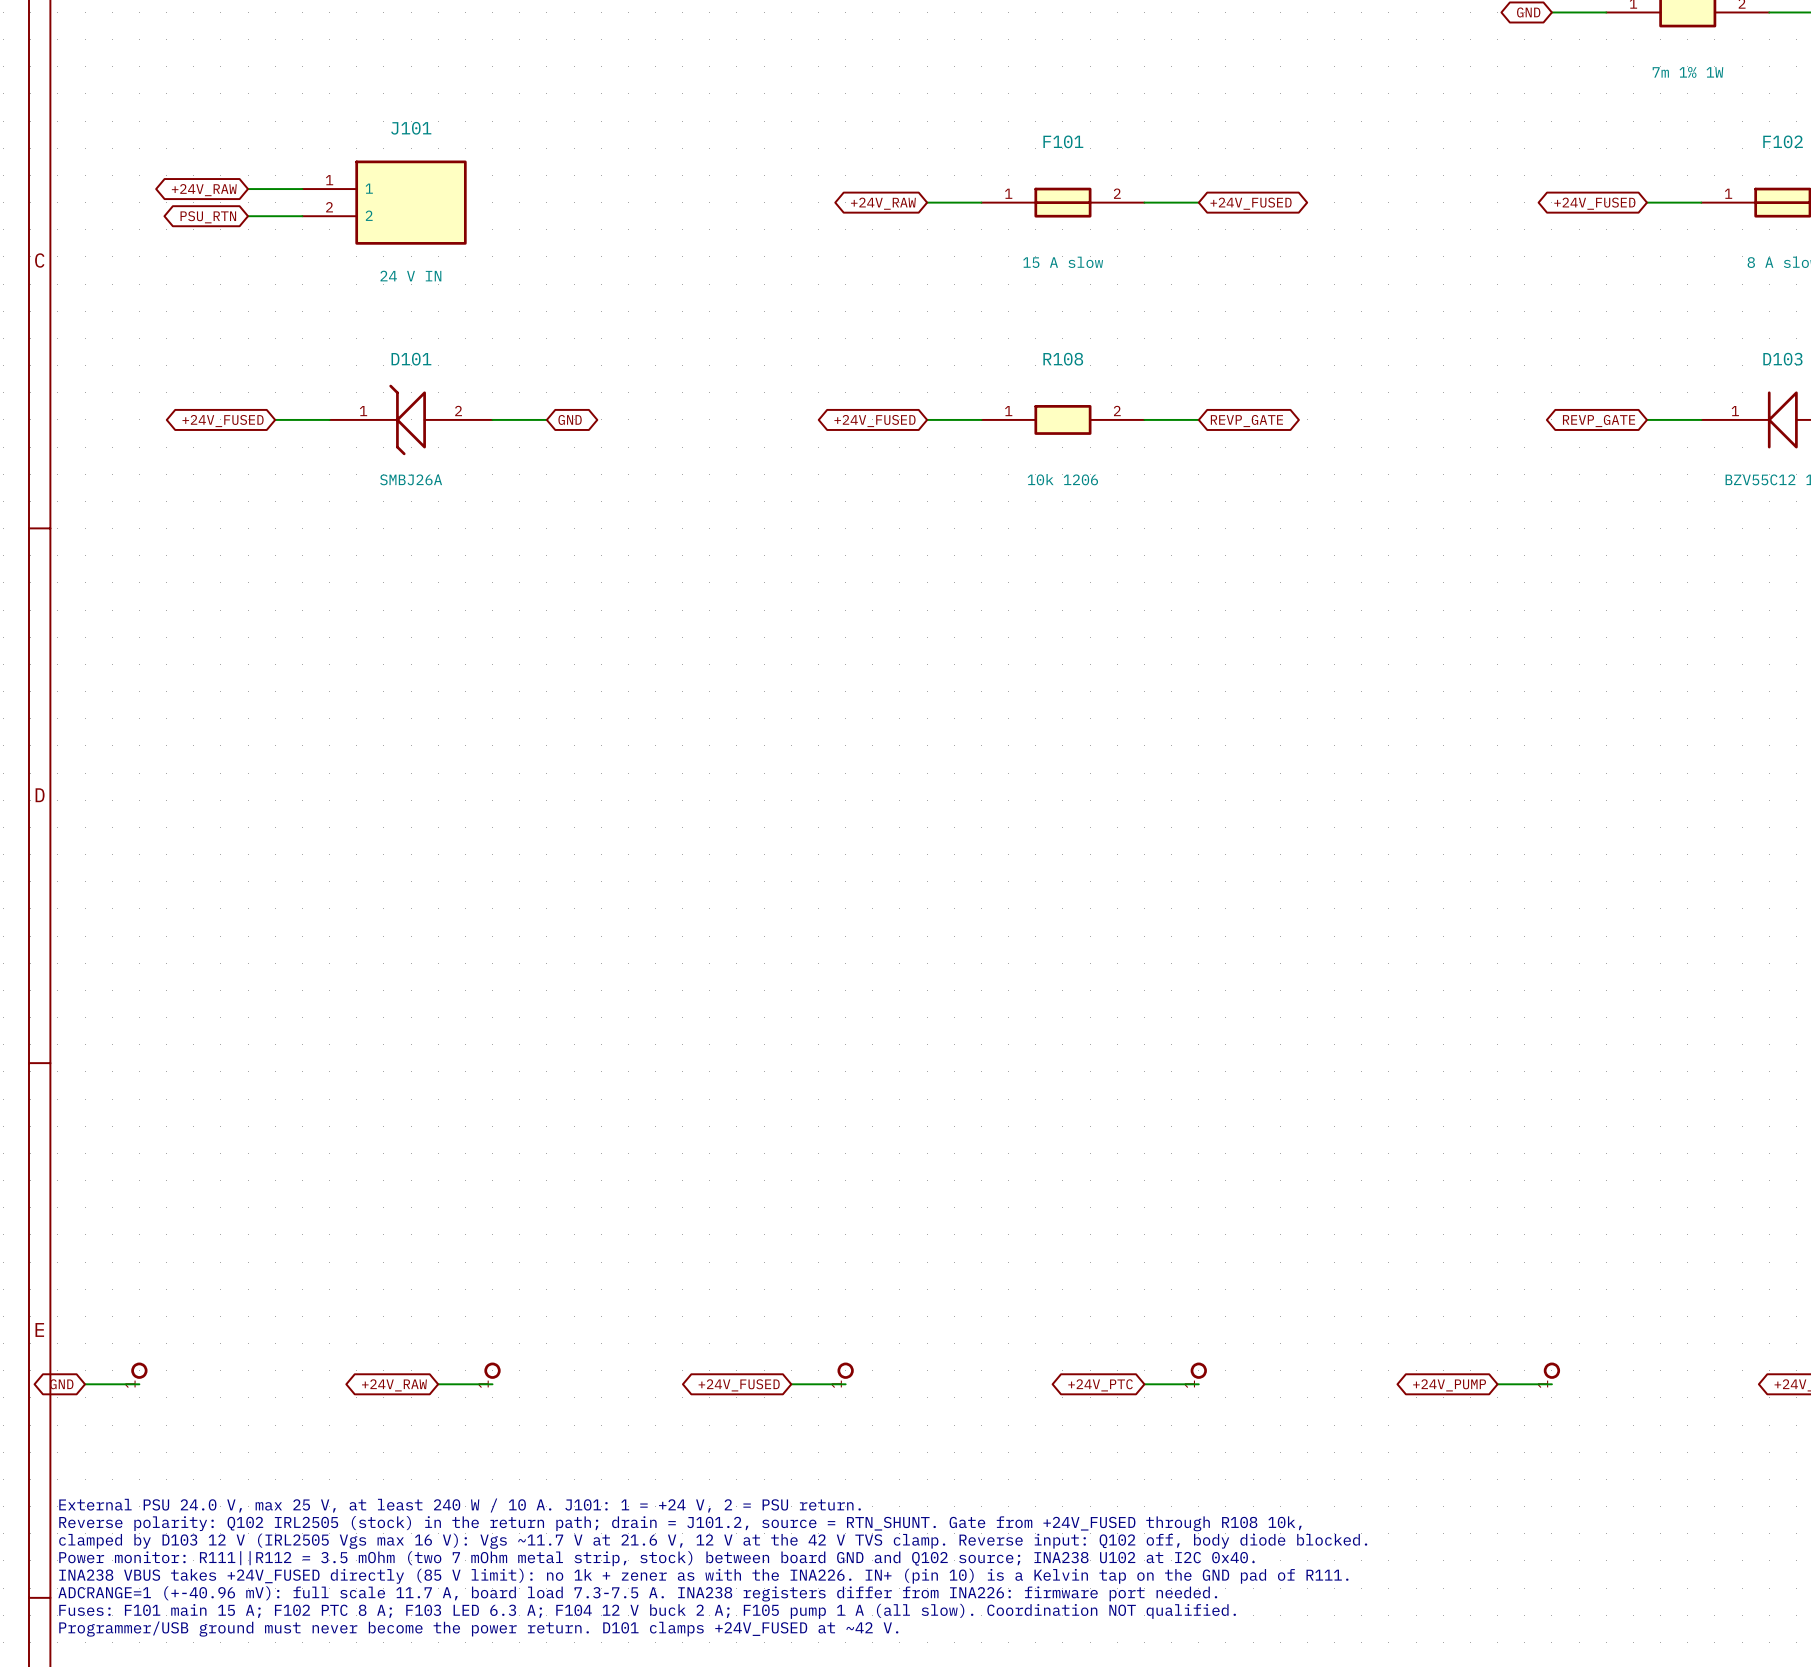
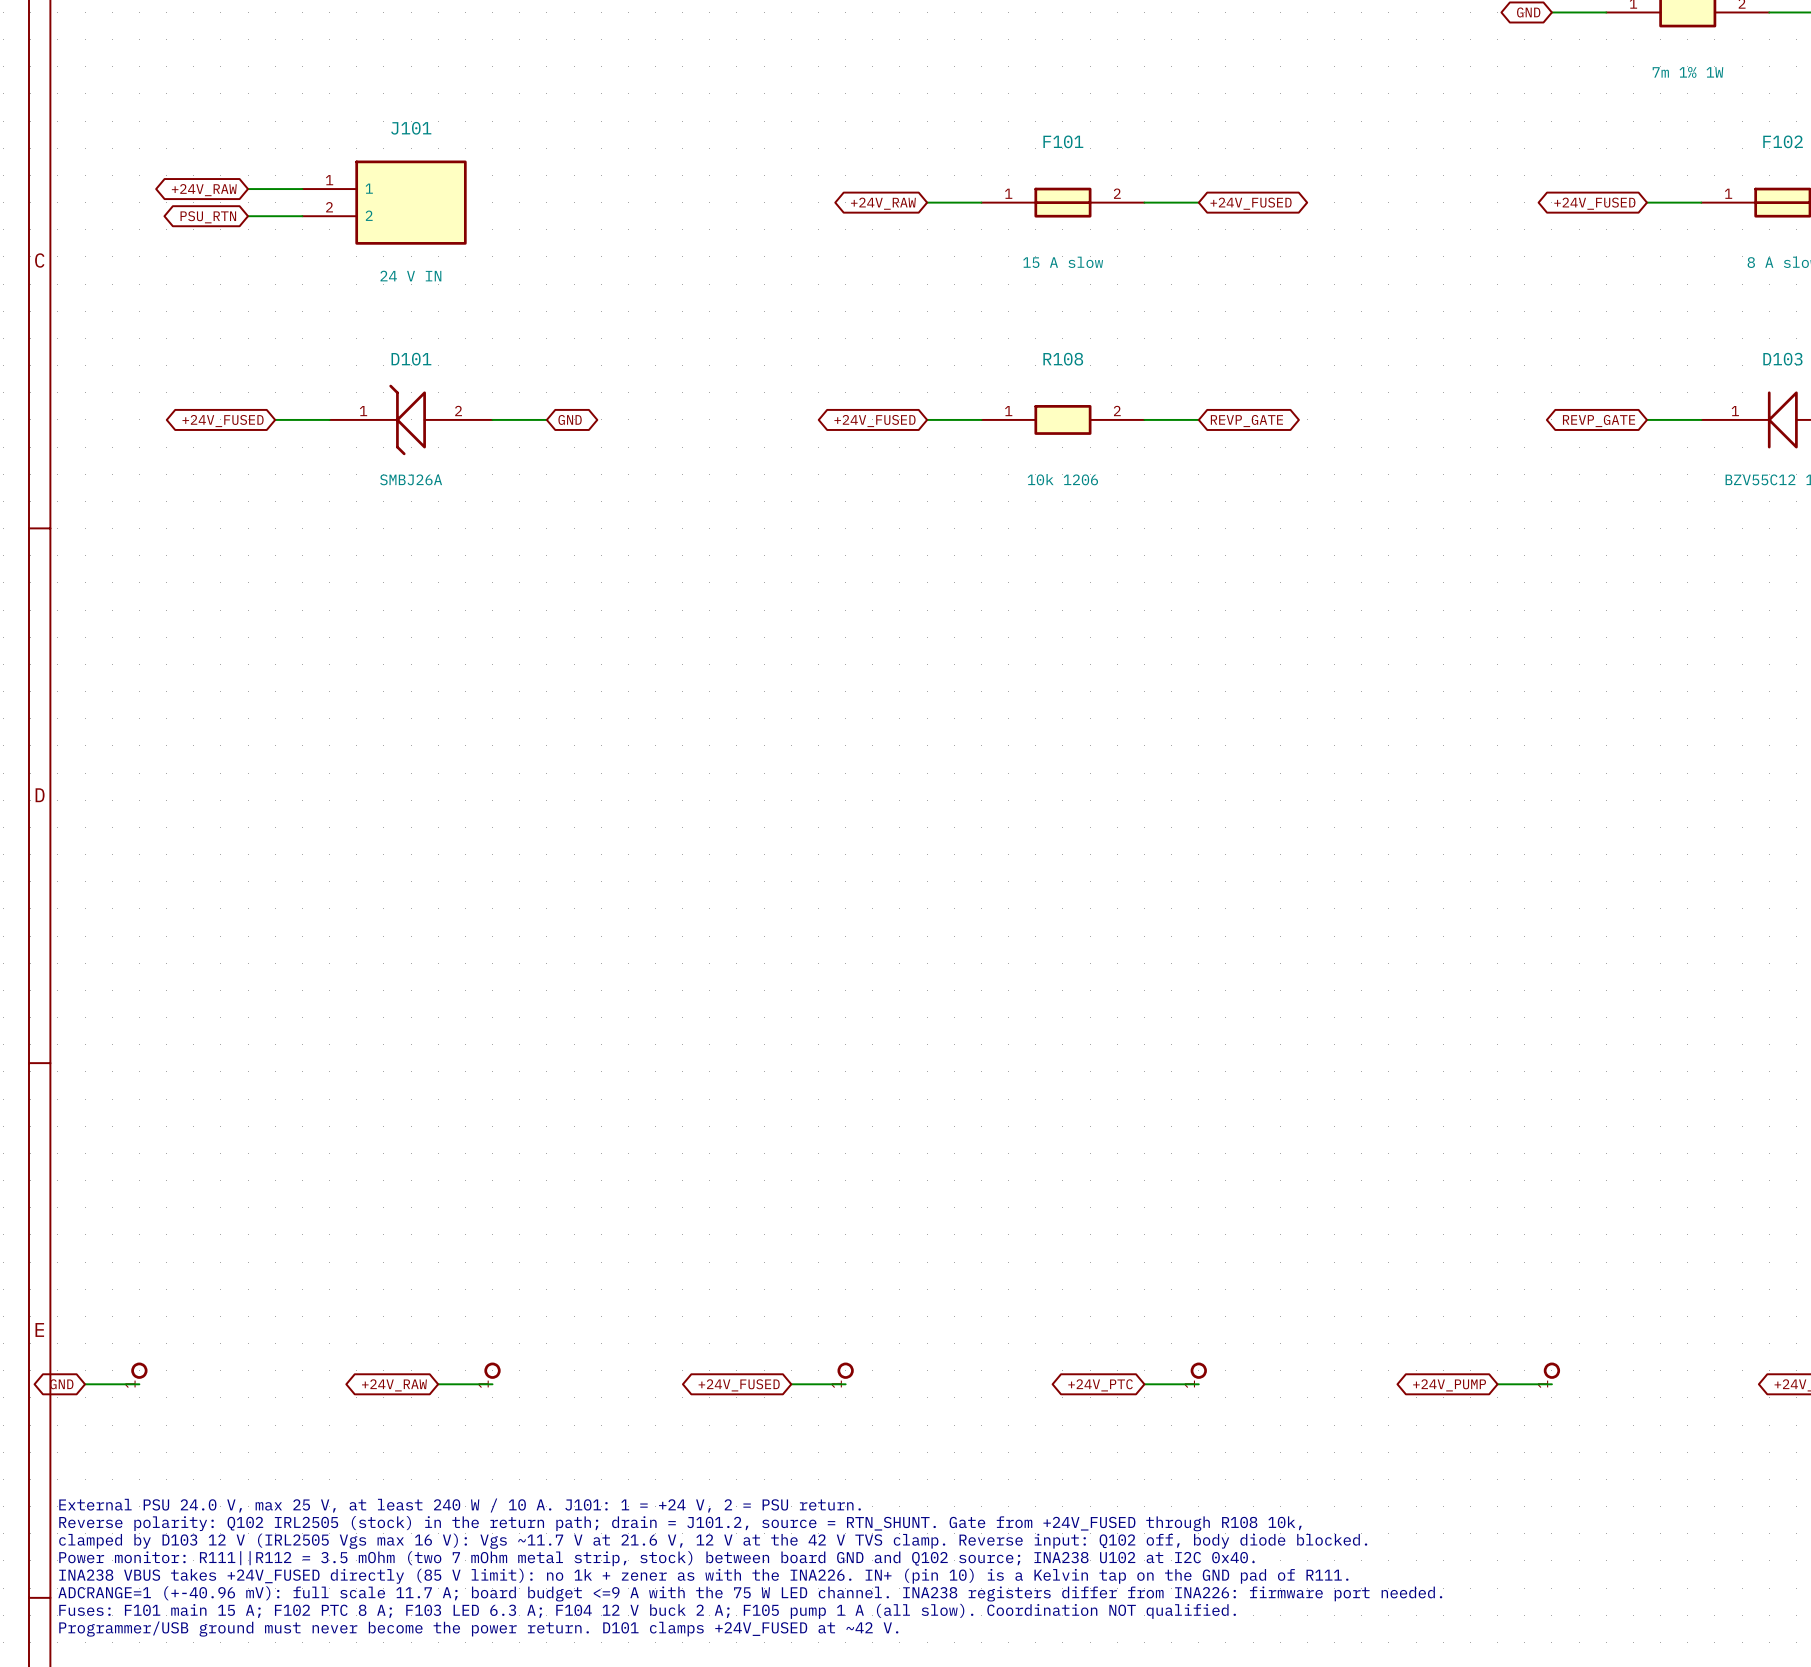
text: ADCRANGE=1 (+-40.96 mV): full scale 11.7 A, board load 7.3-7.5 A. INA238 registers differ from INA226: firmware port needed. (637, 1593) -> ADCRANGE=1 (+-40.96 mV): full scale 11.7 A; board budget <=9 A with the 75 W LED channel. INA238 registers differ from INA226: firmware port needed. (750, 1593)

